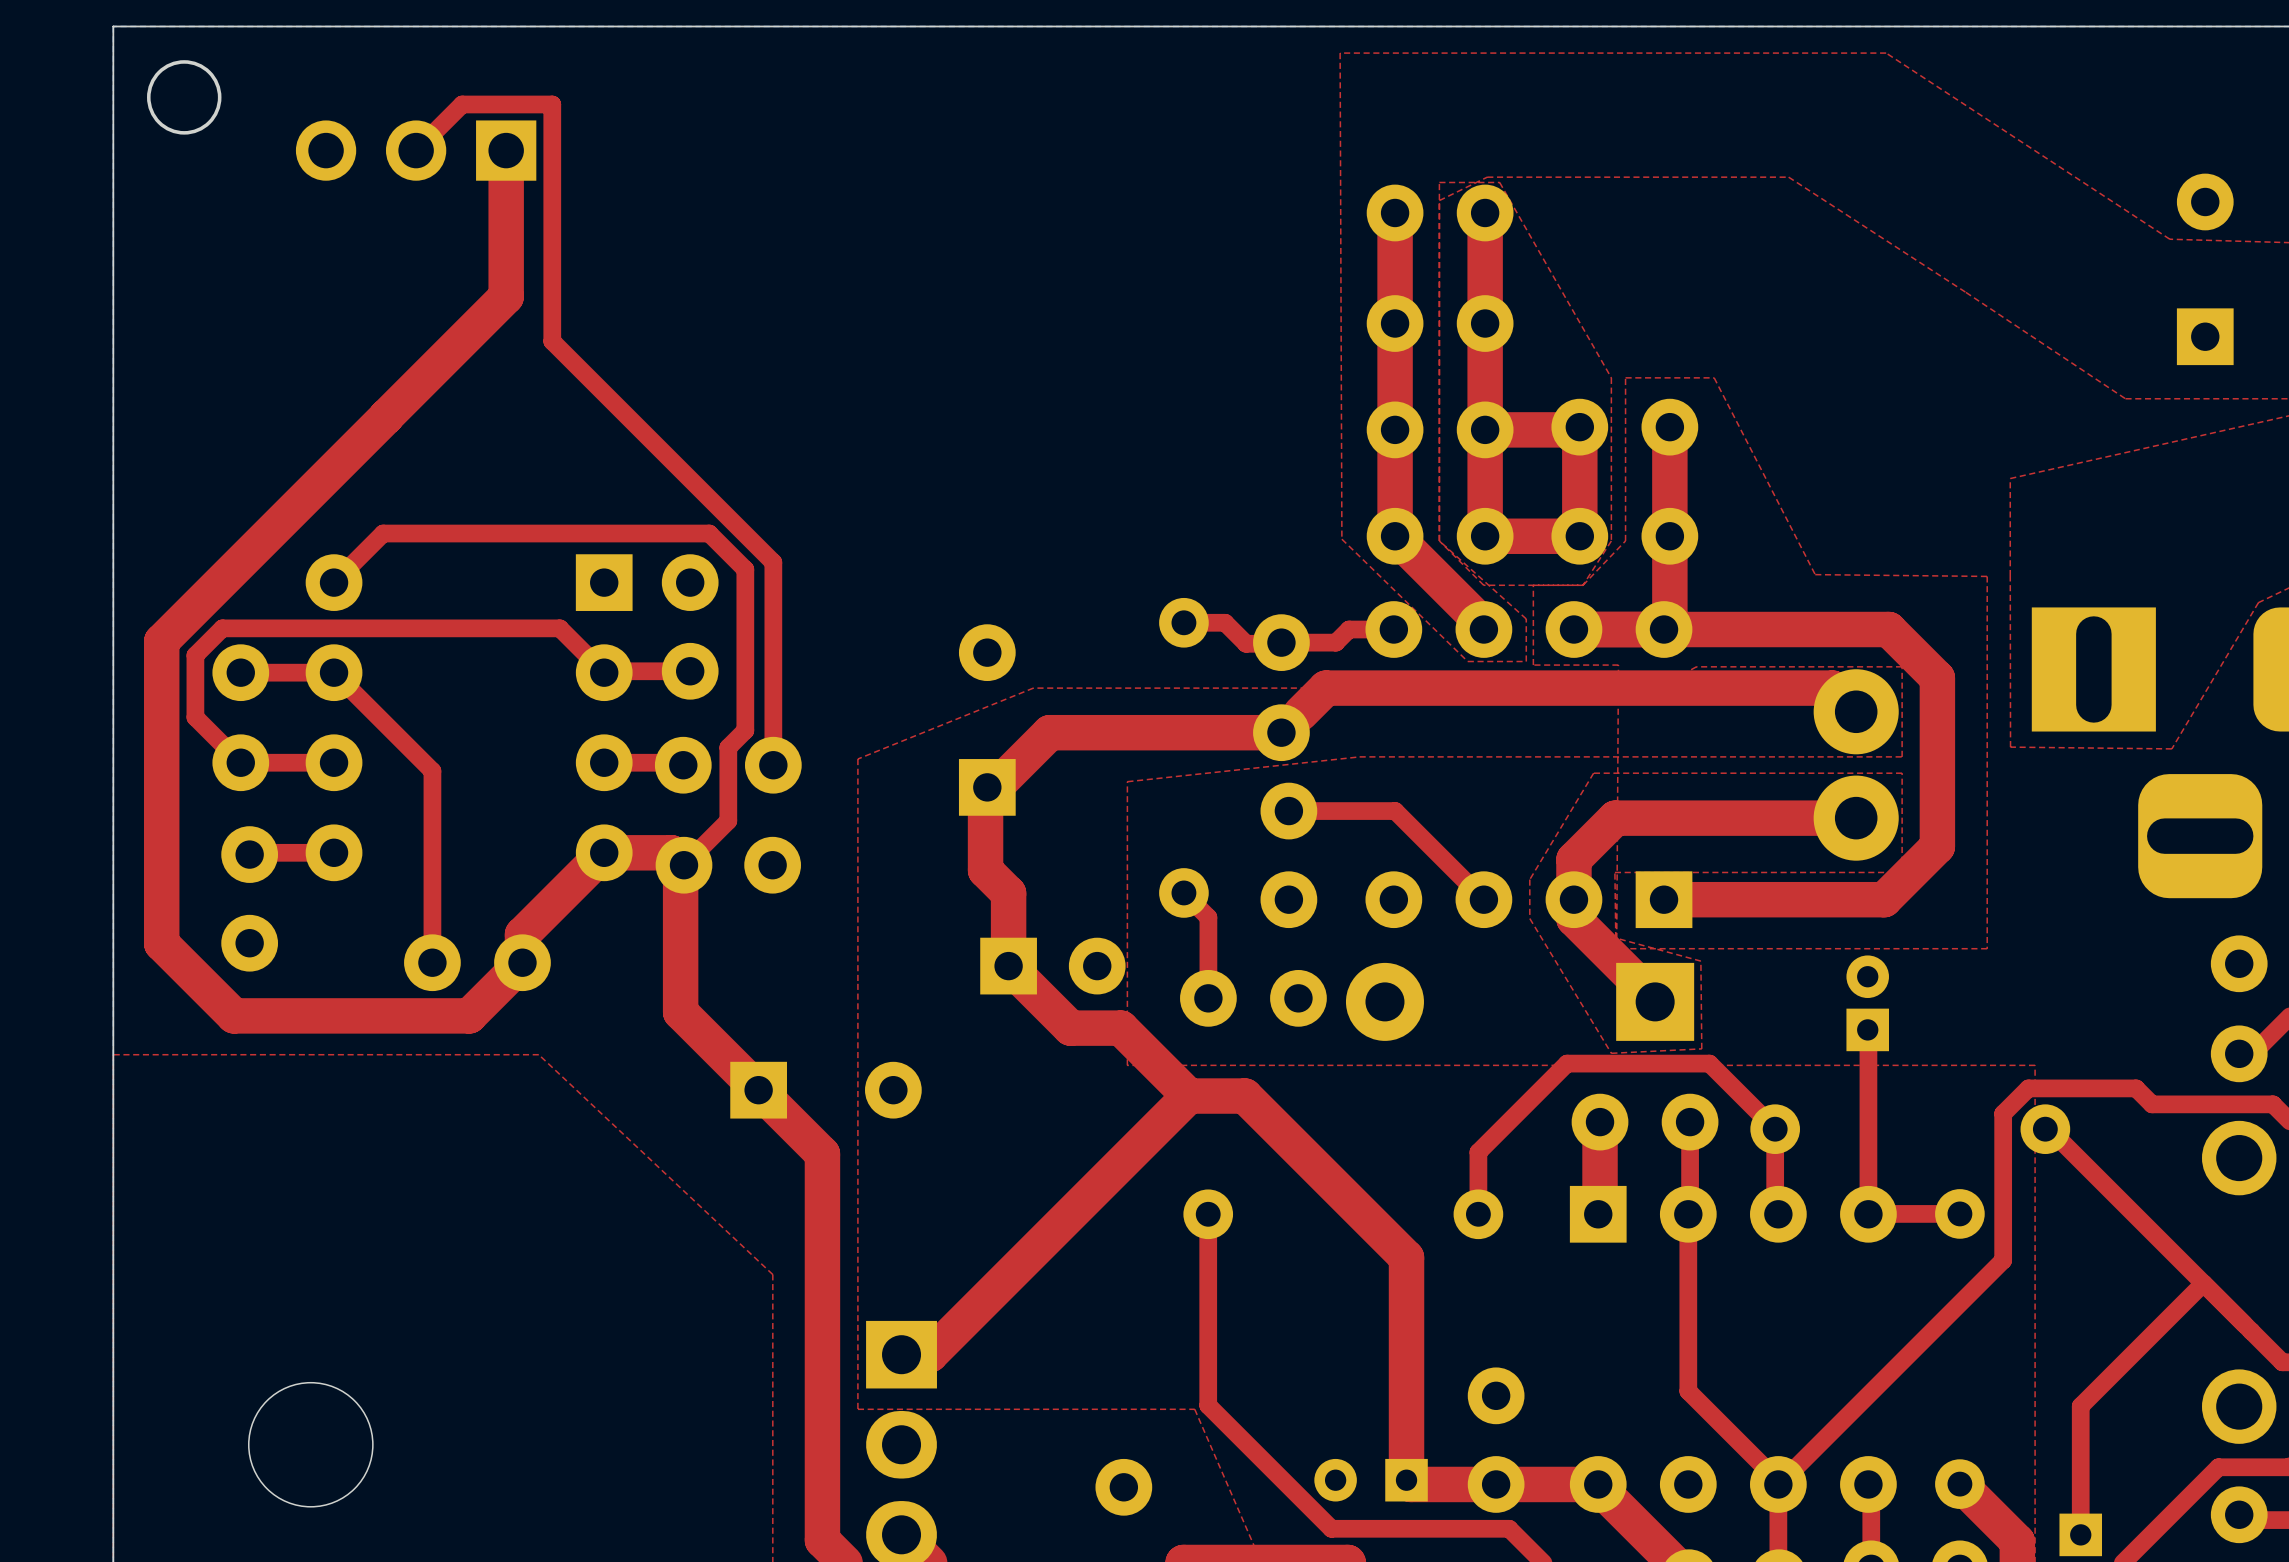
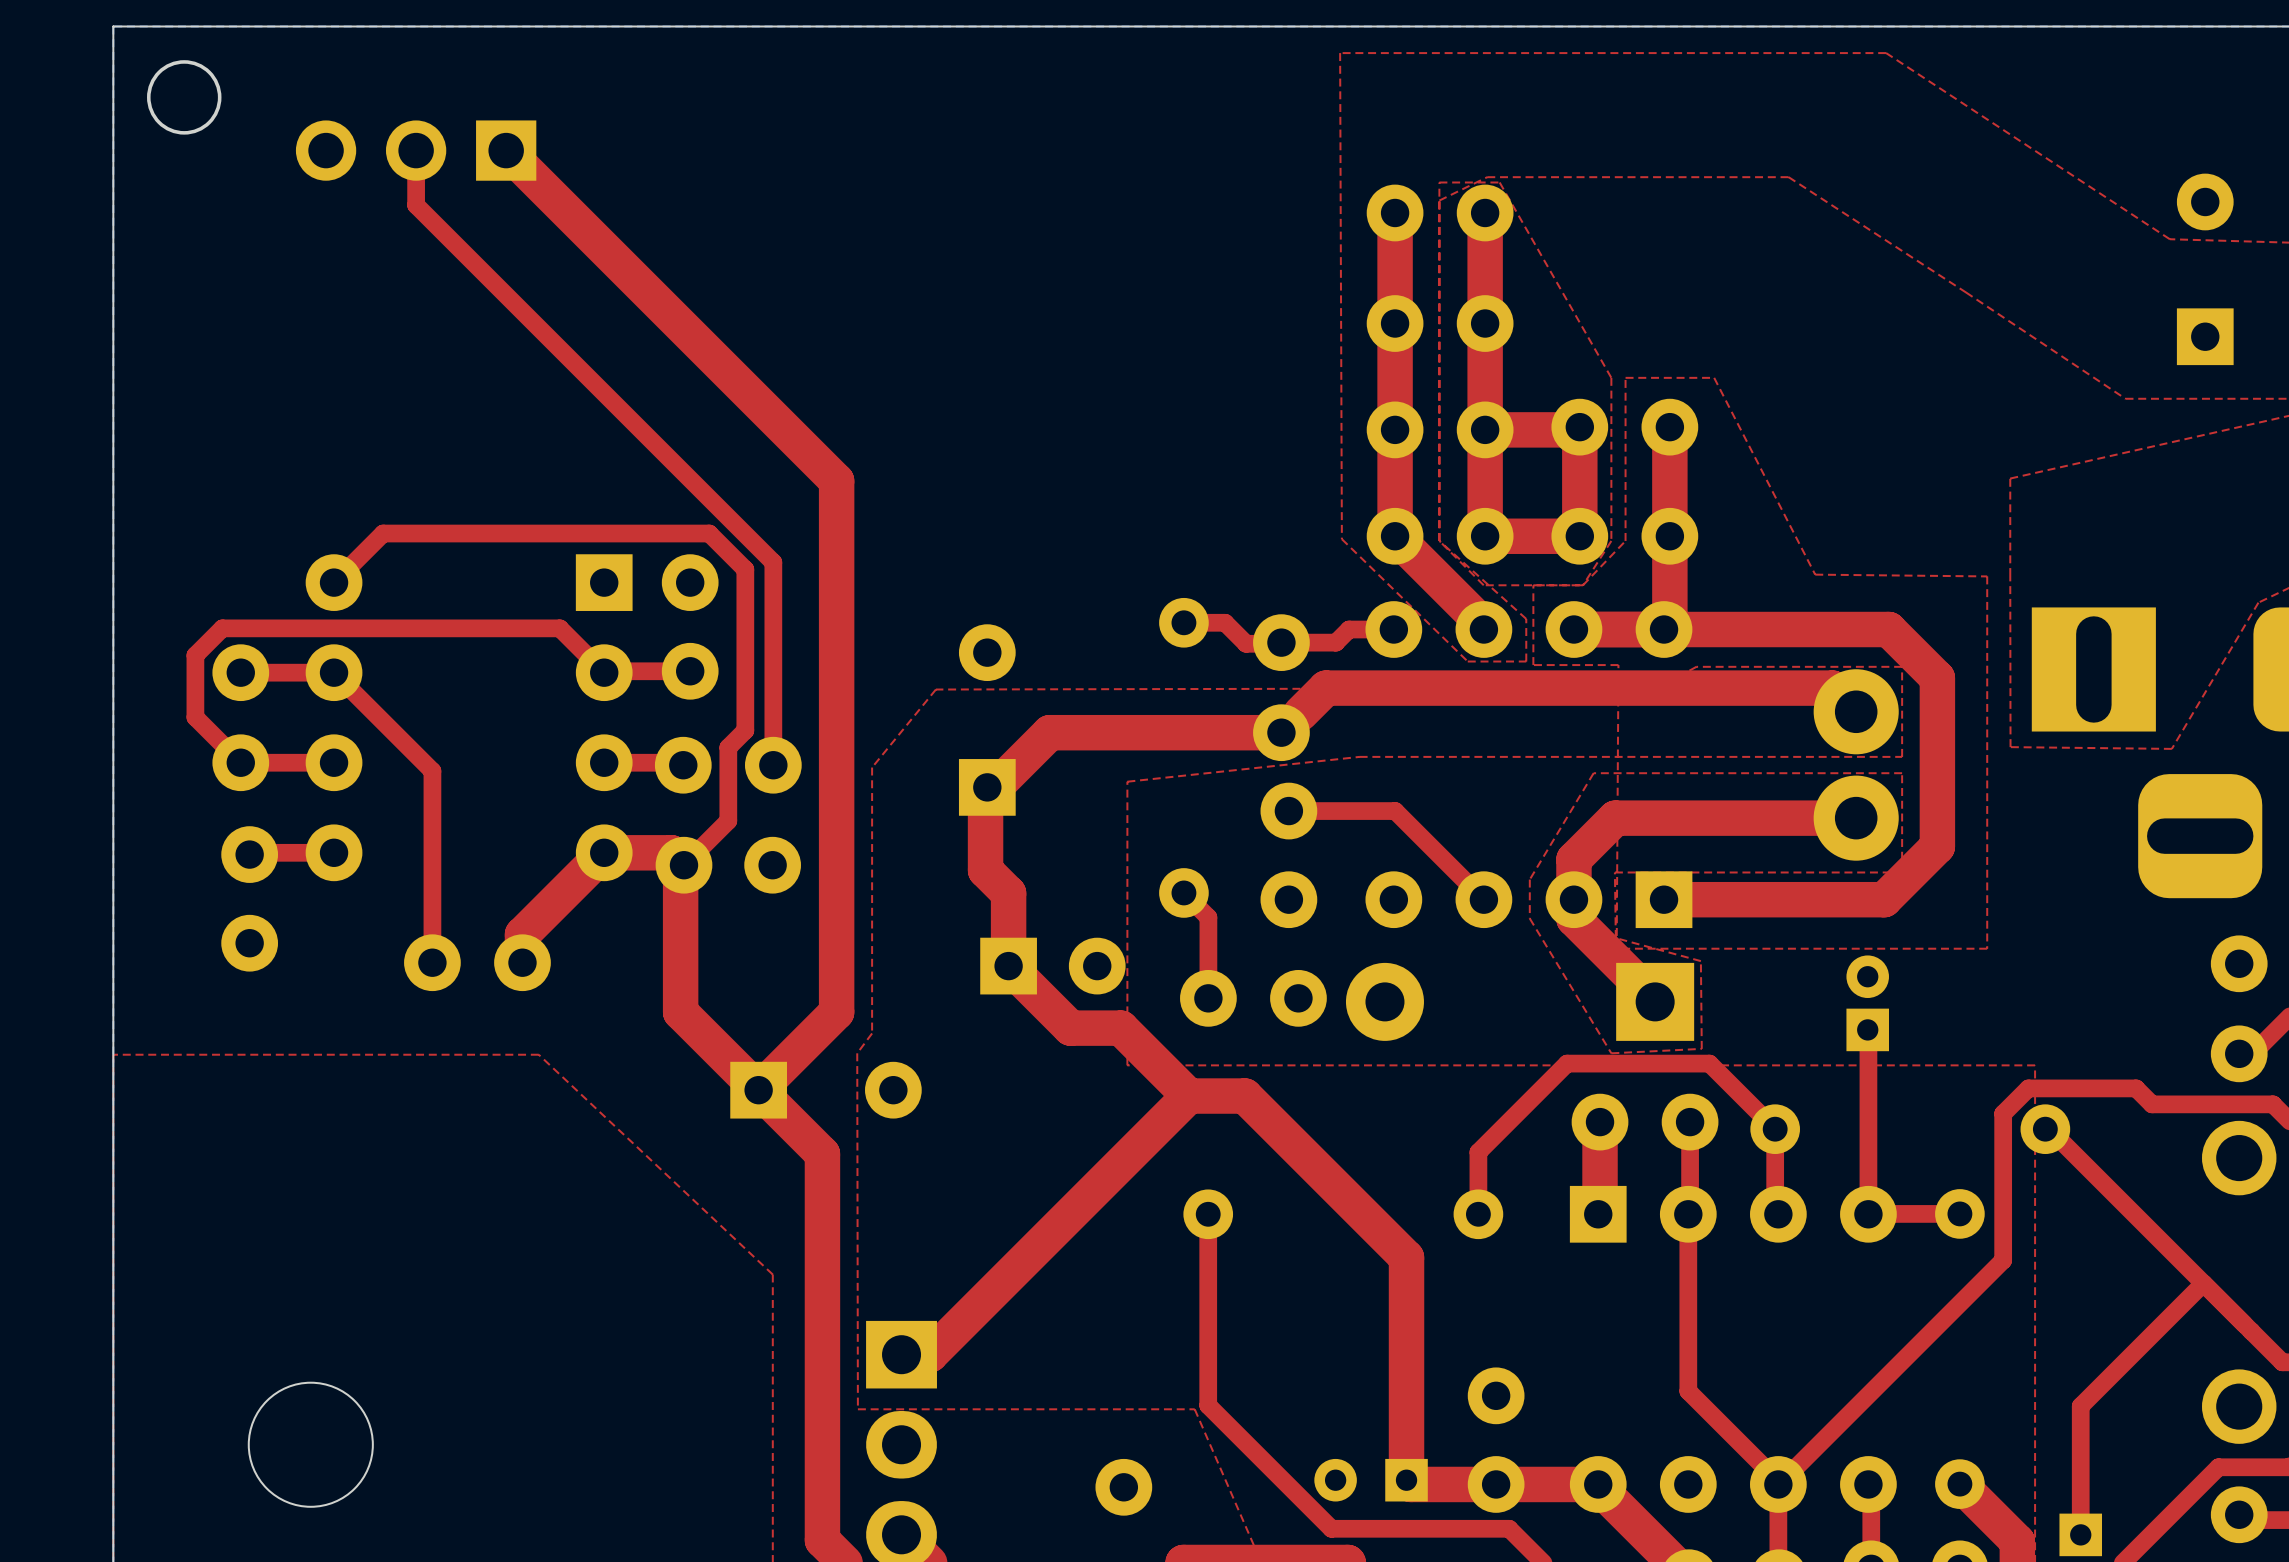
top track: (416, 150) (462, 104) (552, 104) (552, 341) -> (416, 150) (416, 205) (552, 341)
top track: (506, 150) (506, 296) (386, 416) -> (506, 150) (836, 481) (836, 1012) (758, 1090)
top track: (386, 416) (161, 641) (161, 943) (234, 1015) (469, 1015) (522, 962) -> none
top zone outline: (1657, 688) (1033, 688) (857, 759) (857, 1409) -> (1657, 688) (935, 689) (872, 767) (872, 1033) (857, 1053) (857, 1409)

